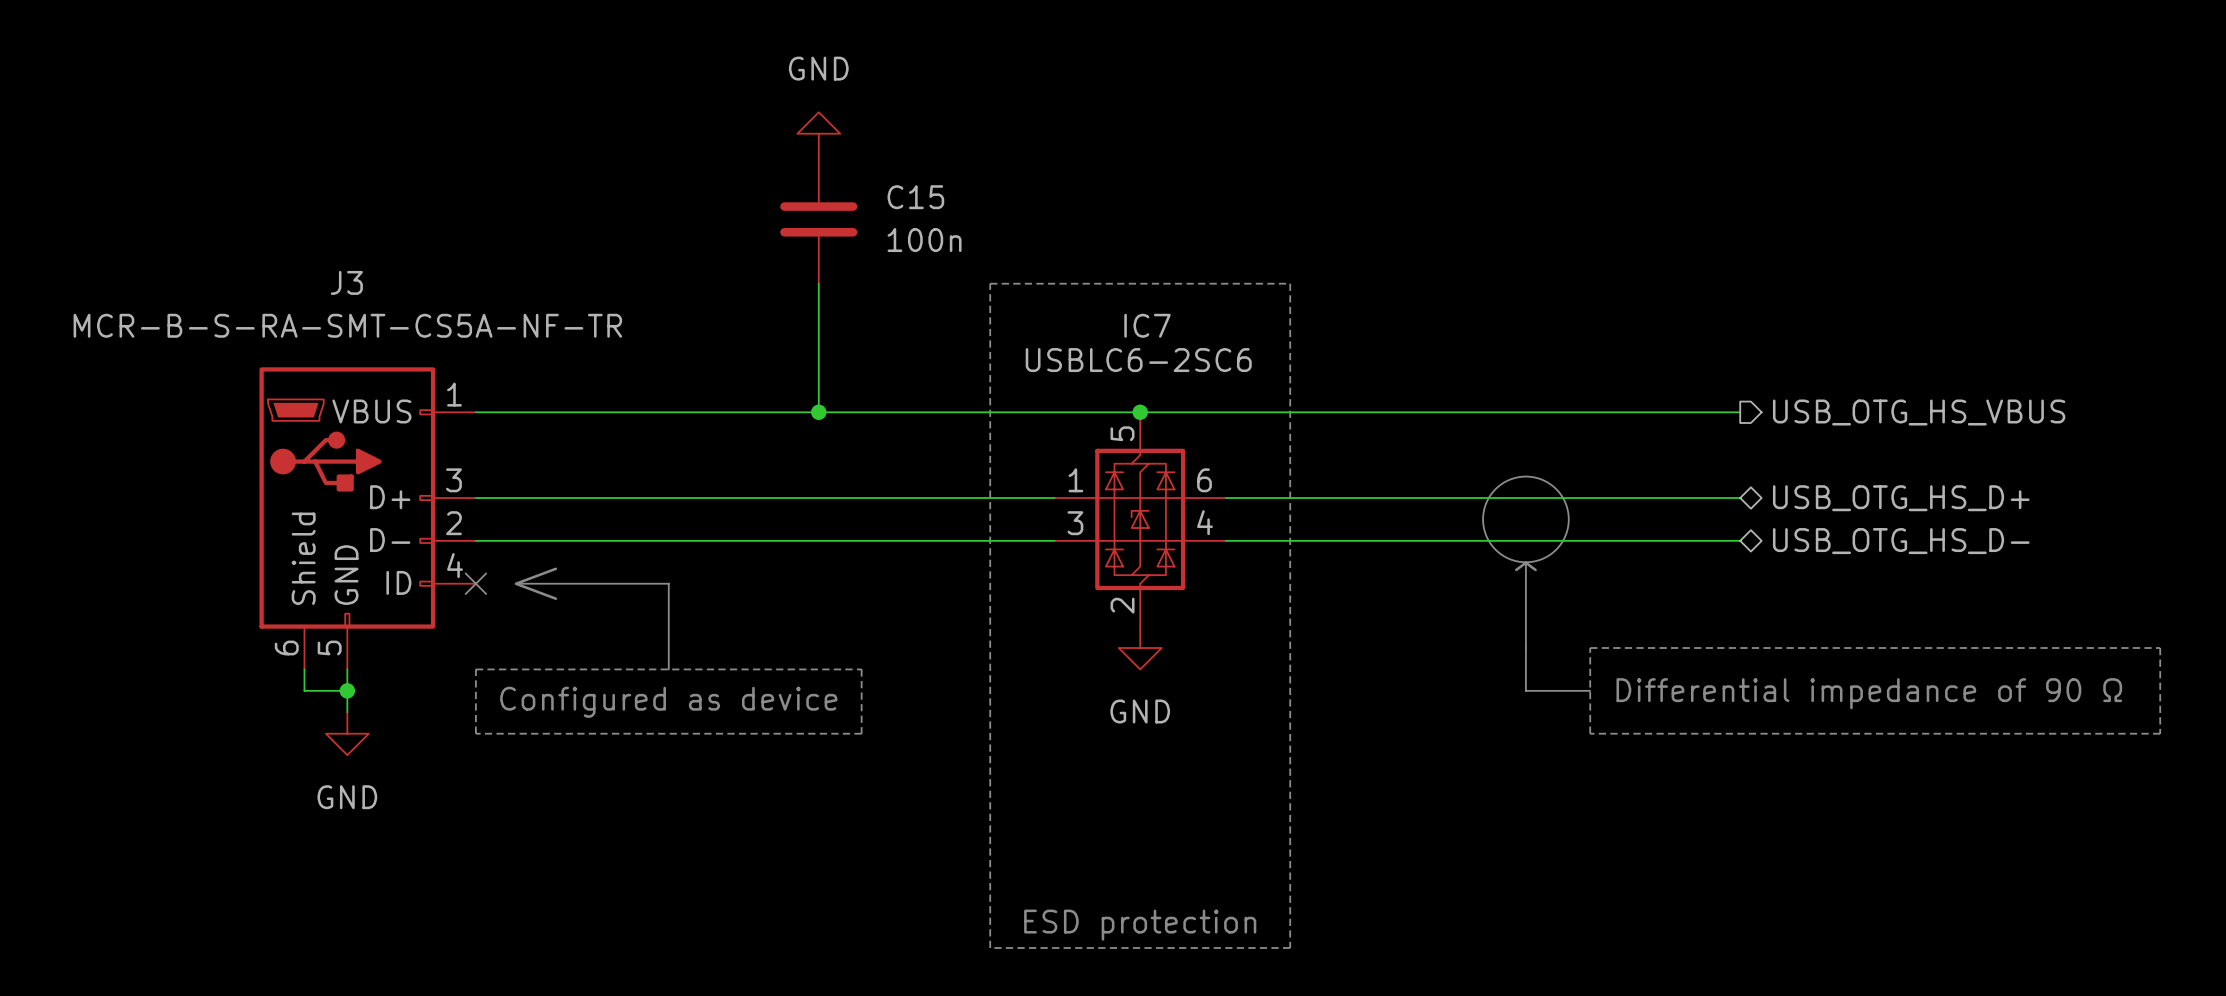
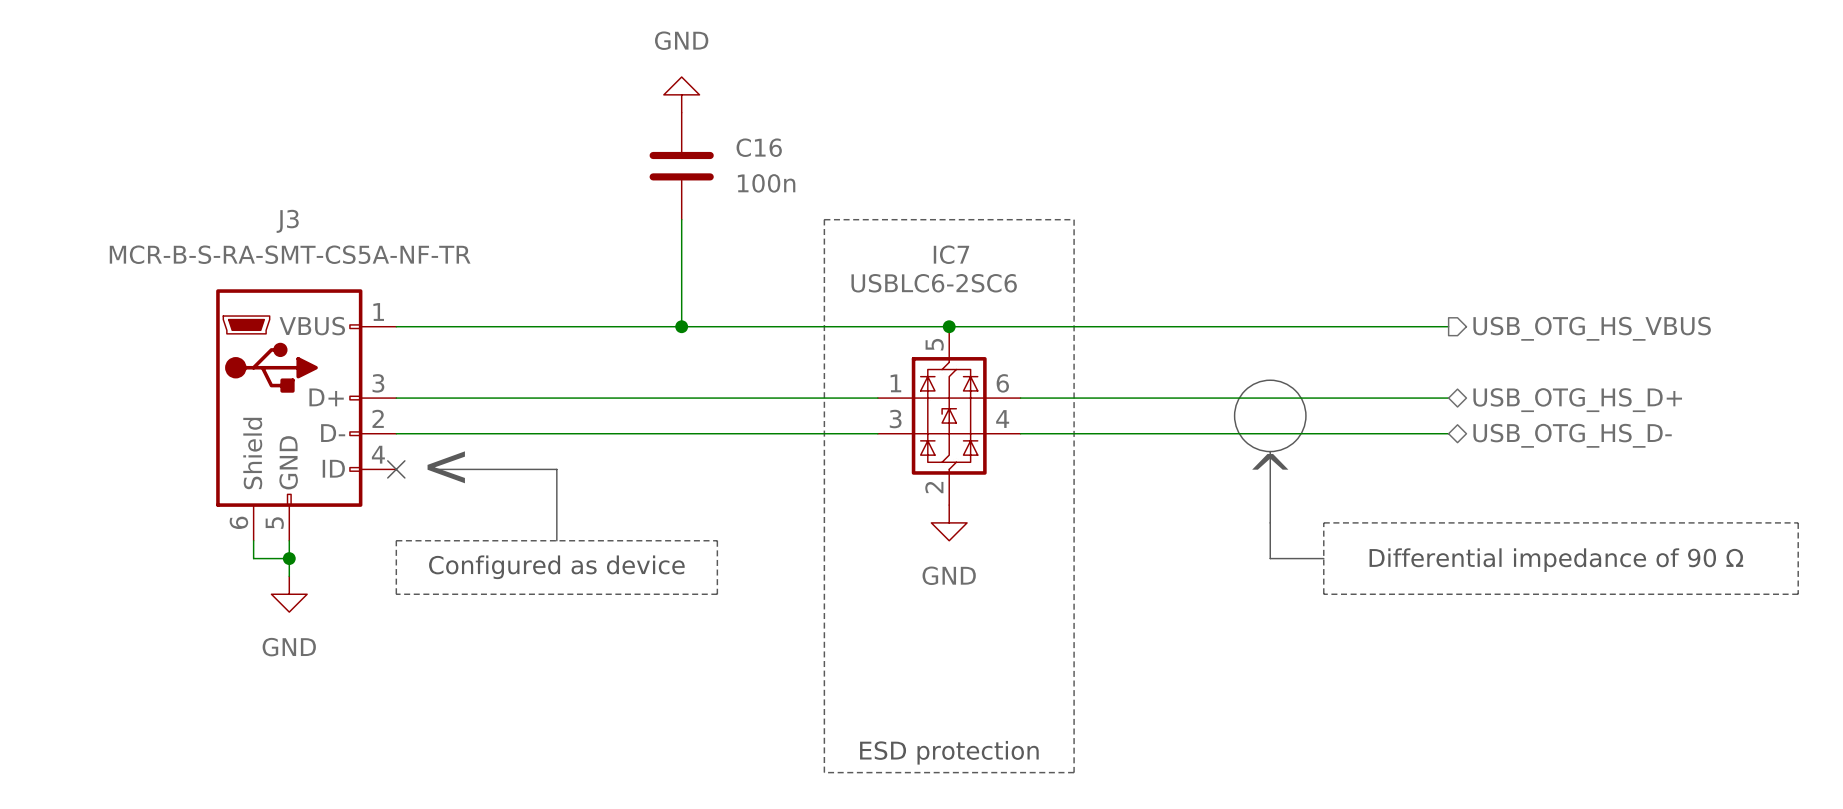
C15 name: C15 (915, 197) -> C16 (759, 147)

